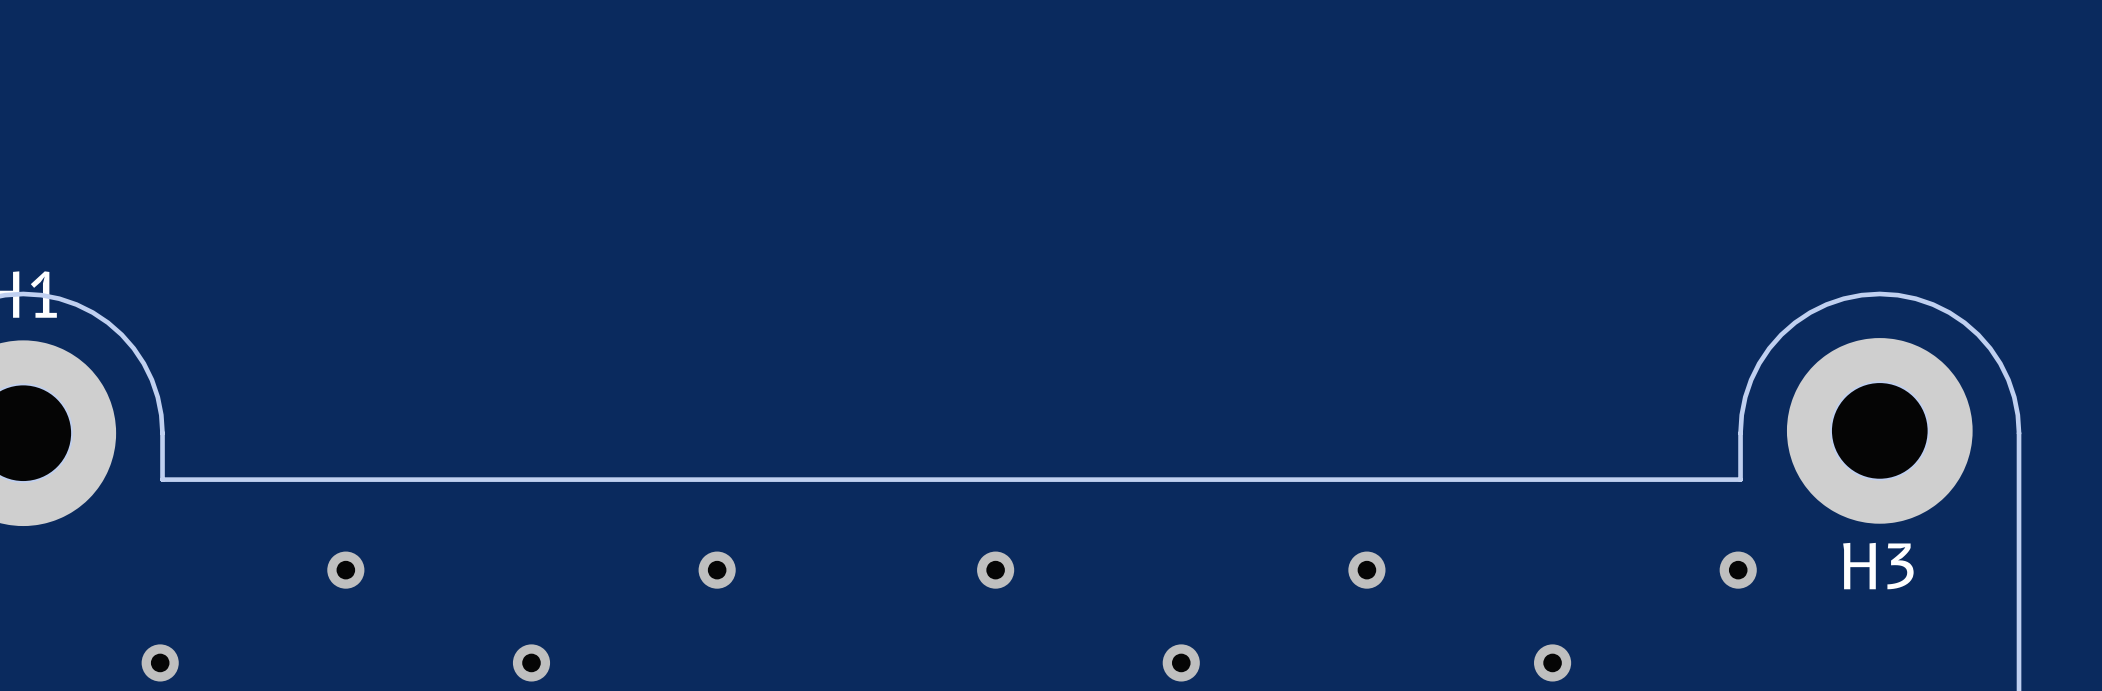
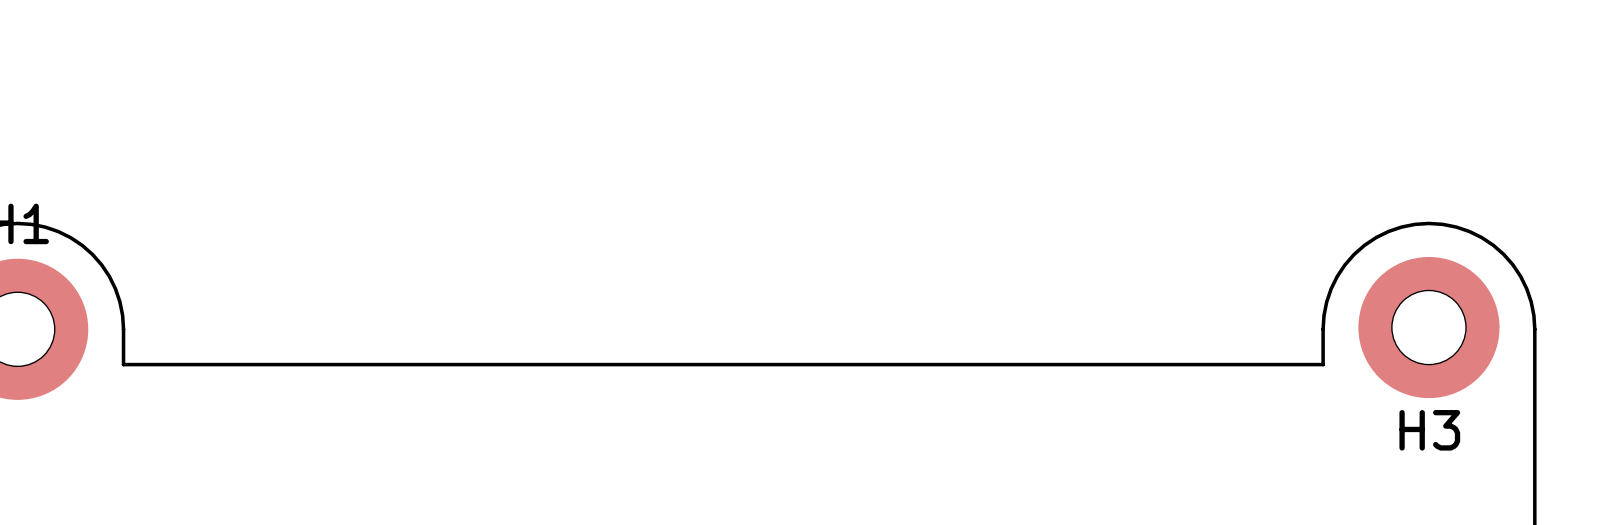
via: (345, 570) -> none
via: (717, 570) -> none
via: (995, 570) -> none
via: (1366, 570) -> none
via: (1738, 570) -> none
via: (160, 662) -> none
via: (531, 662) -> none
via: (1181, 662) -> none
via: (1552, 662) -> none

